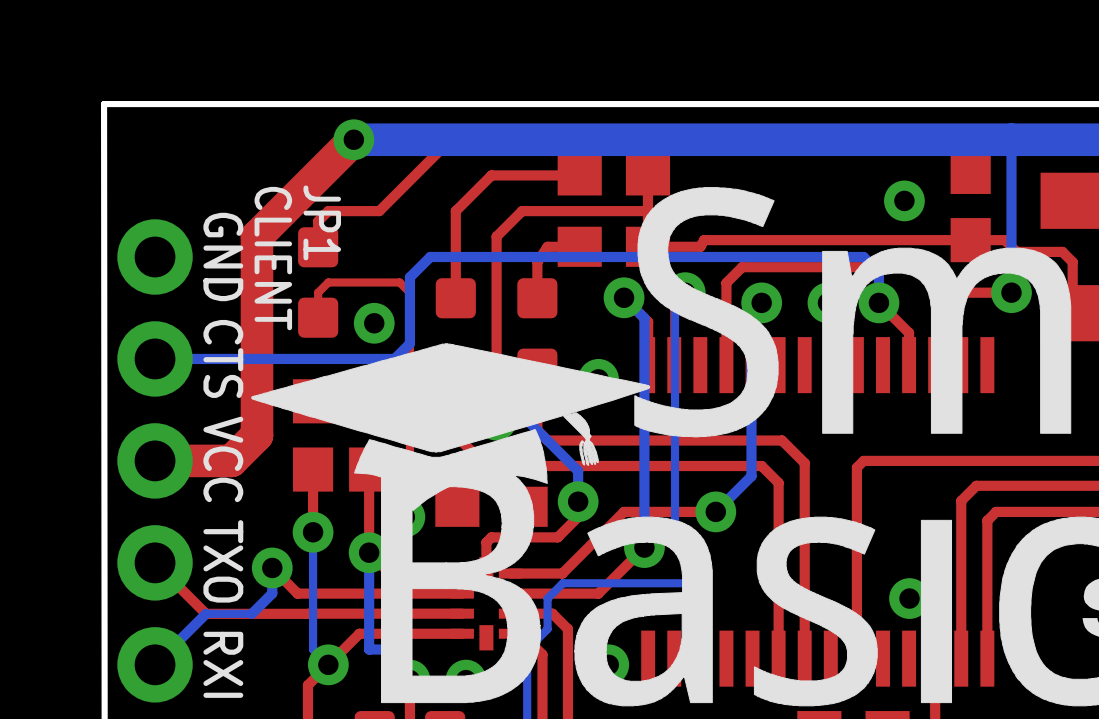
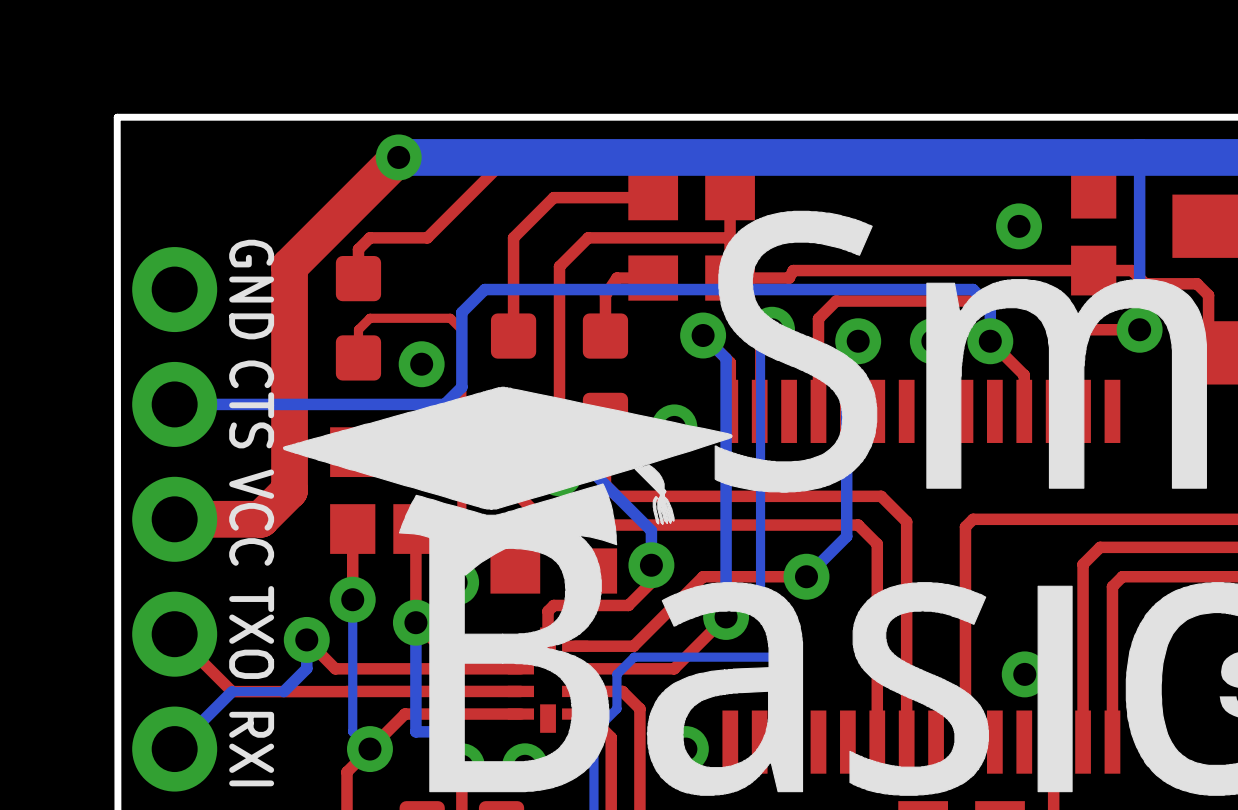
text: JP1 (322, 222) -> none
text: CLIENT (273, 258) -> none

